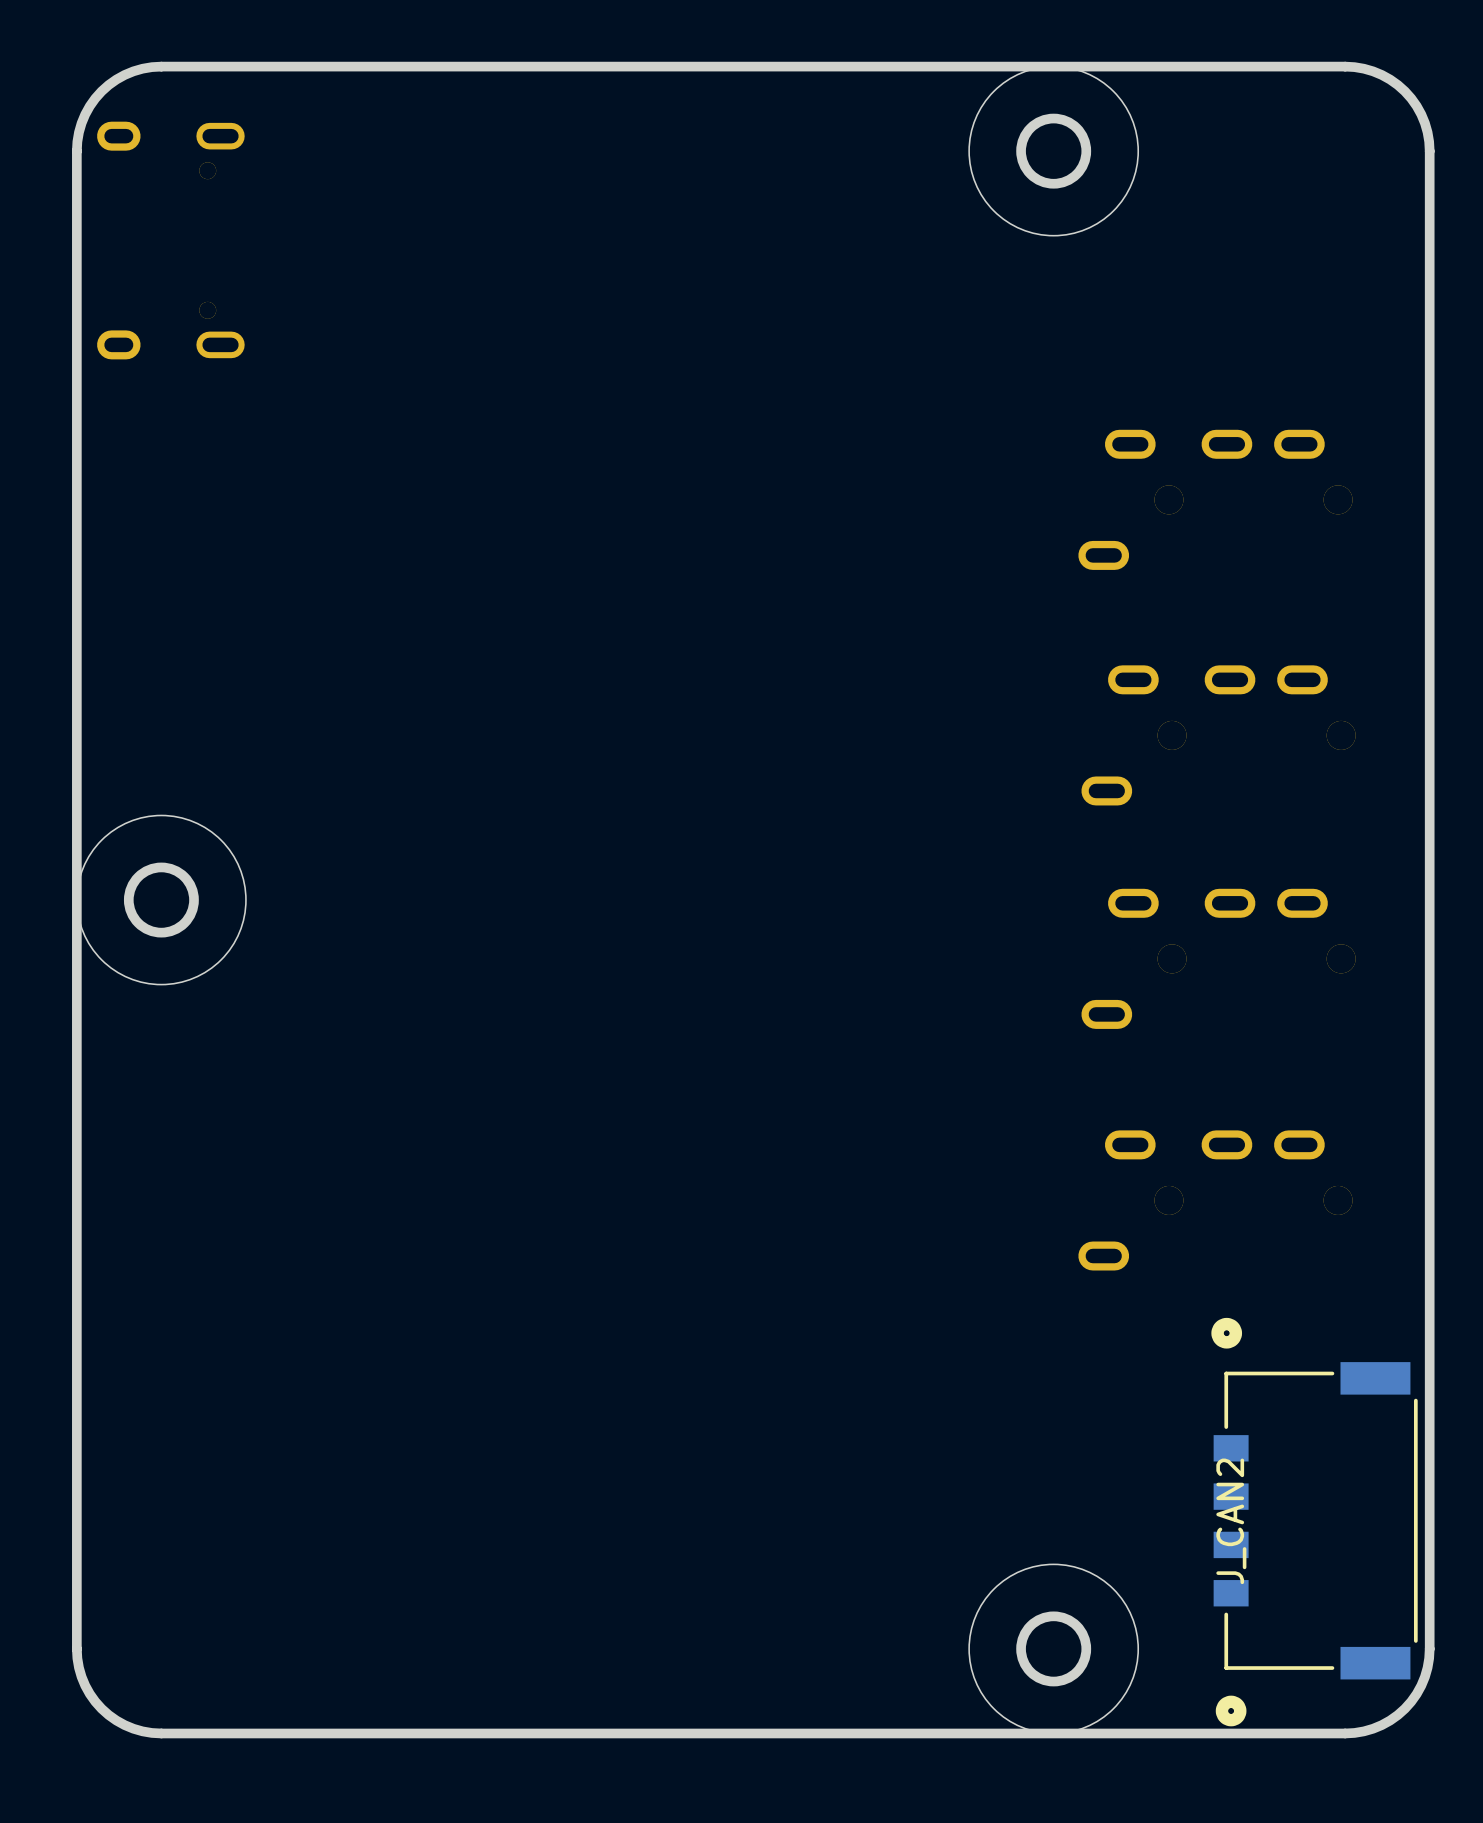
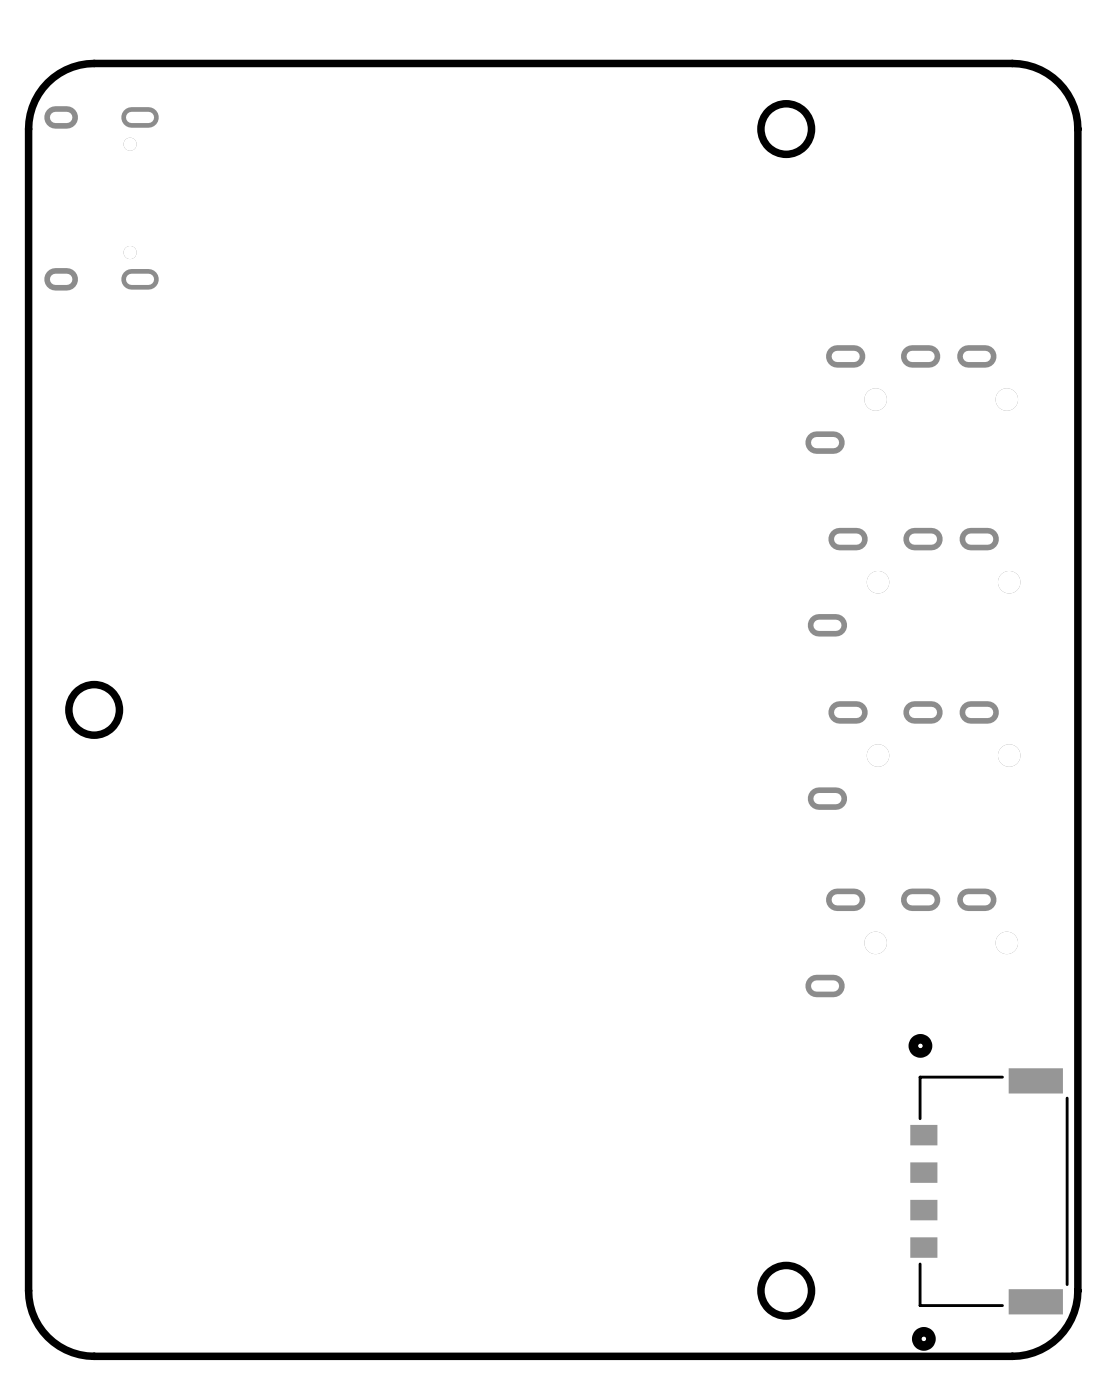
round board edge: [968, 65, 1139, 237] -> none
round board edge: [76, 814, 247, 986] -> none
J_CAN2 name: J_CAN2 (1231, 1521) -> none
round board edge: [968, 1563, 1139, 1735] -> none

